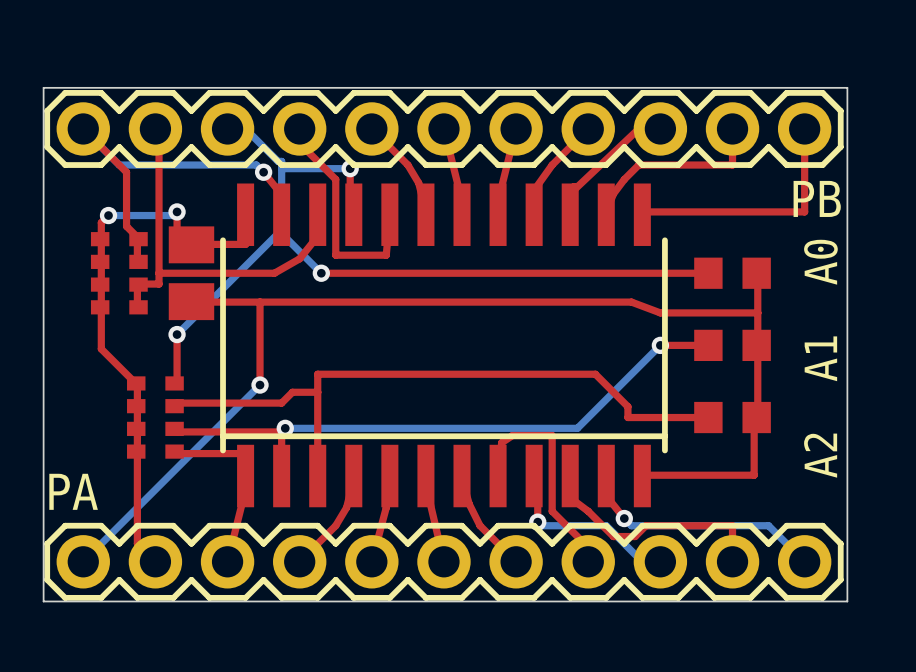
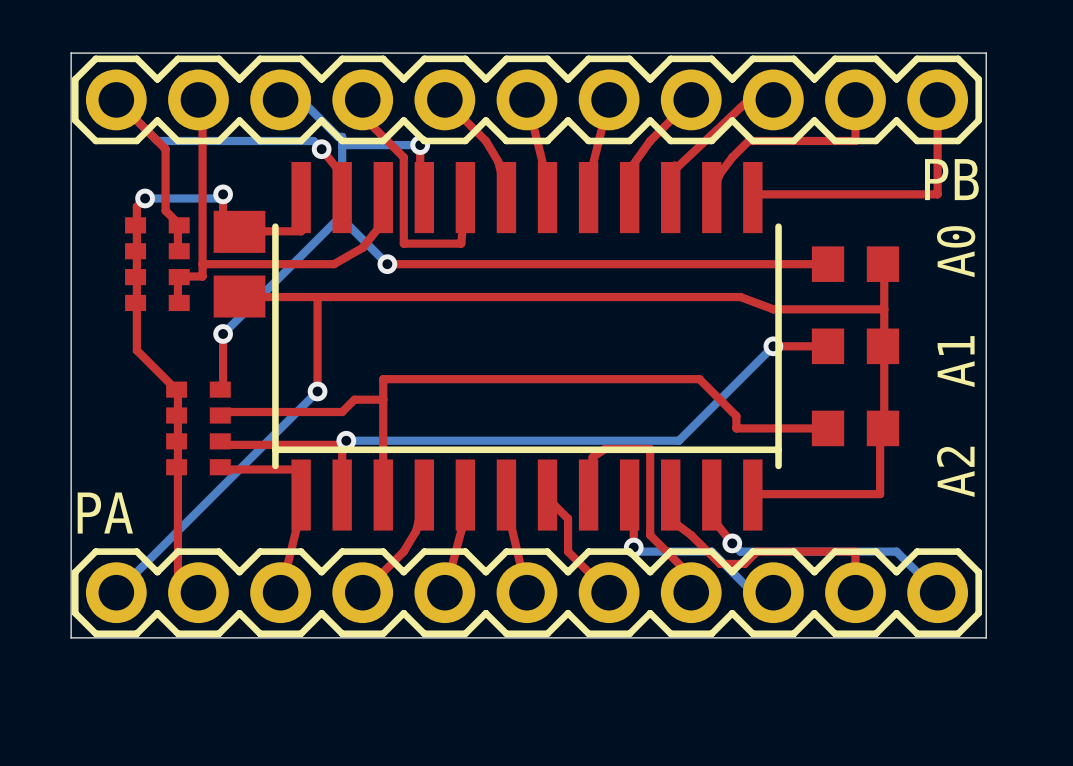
top track: (462, 478) (469, 504) (480, 525) -> (547, 498) (568, 518) (568, 551)

